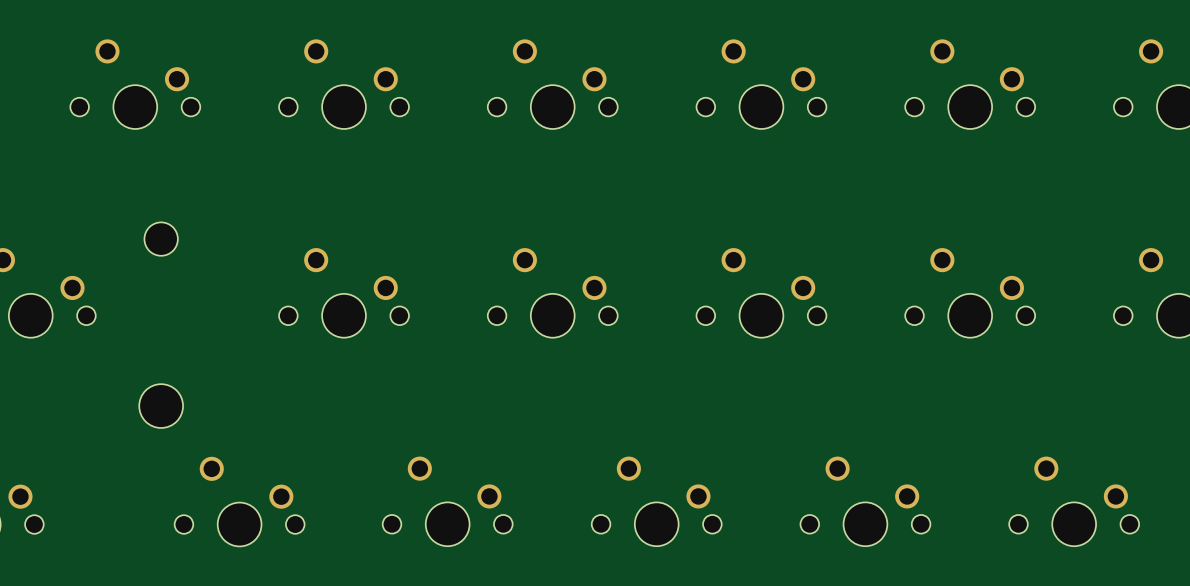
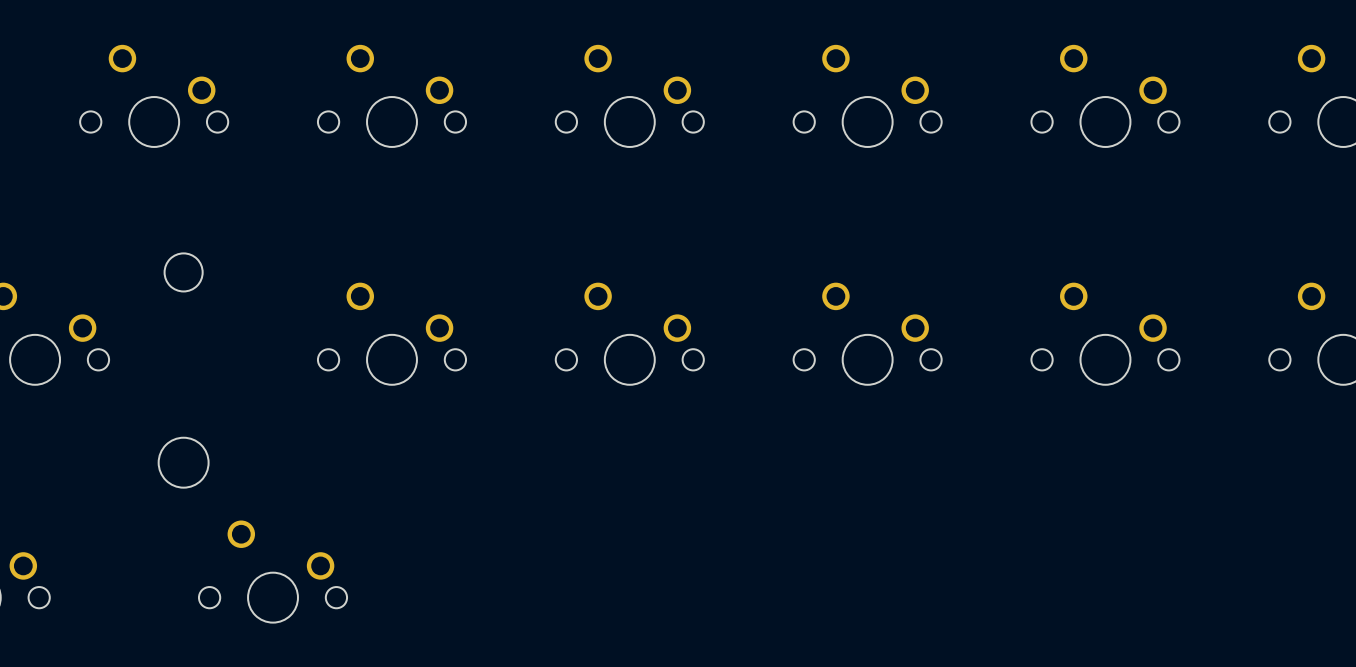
part: (447, 501) -> none
part: (656, 501) -> none
part: (865, 501) -> none
part: (1074, 501) -> none

